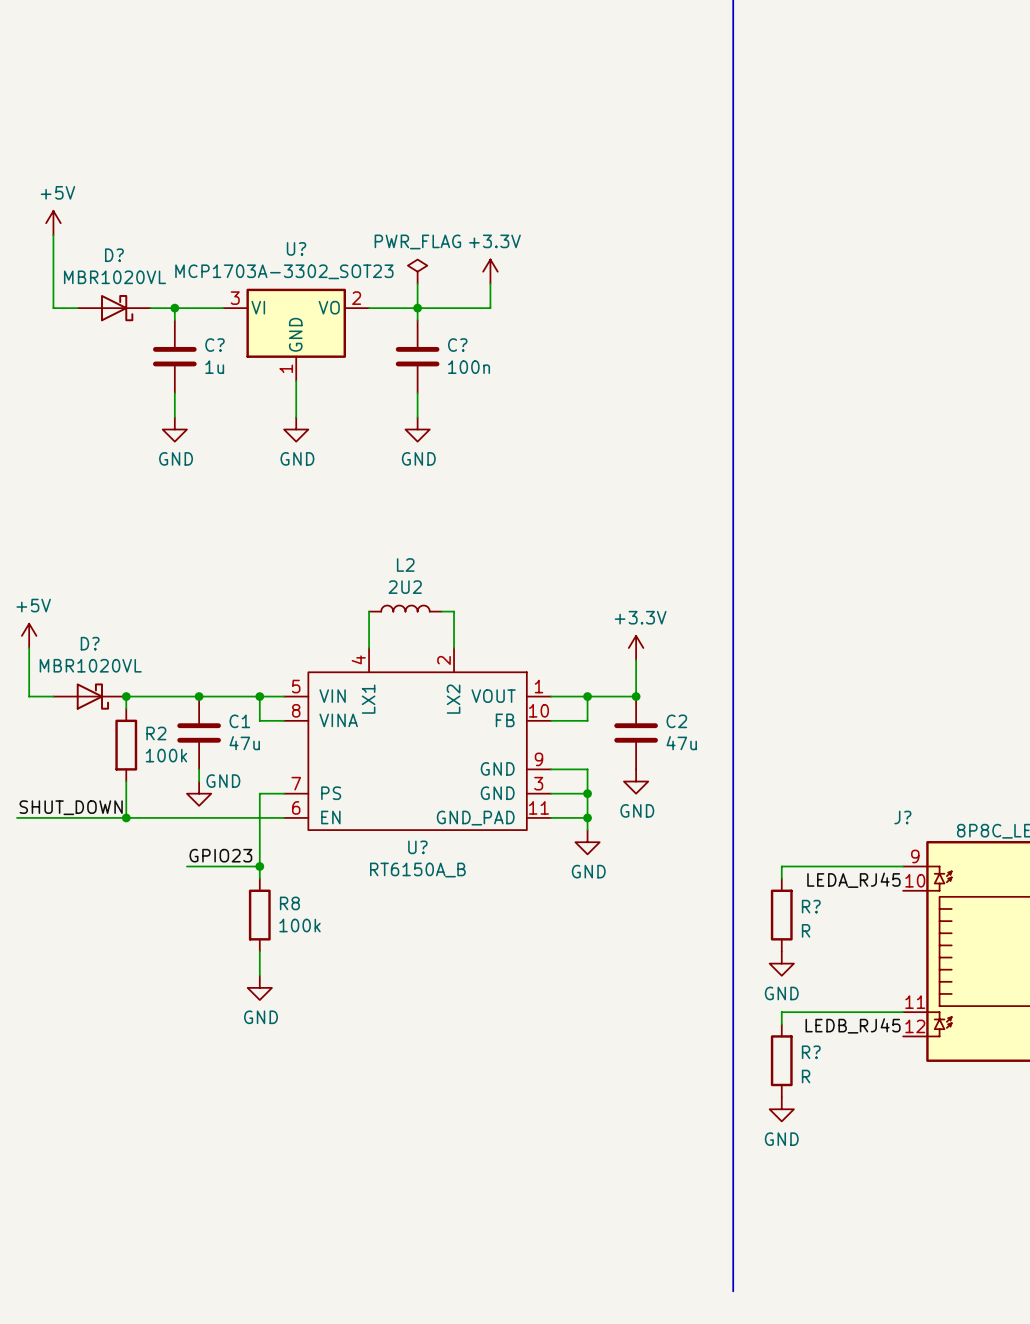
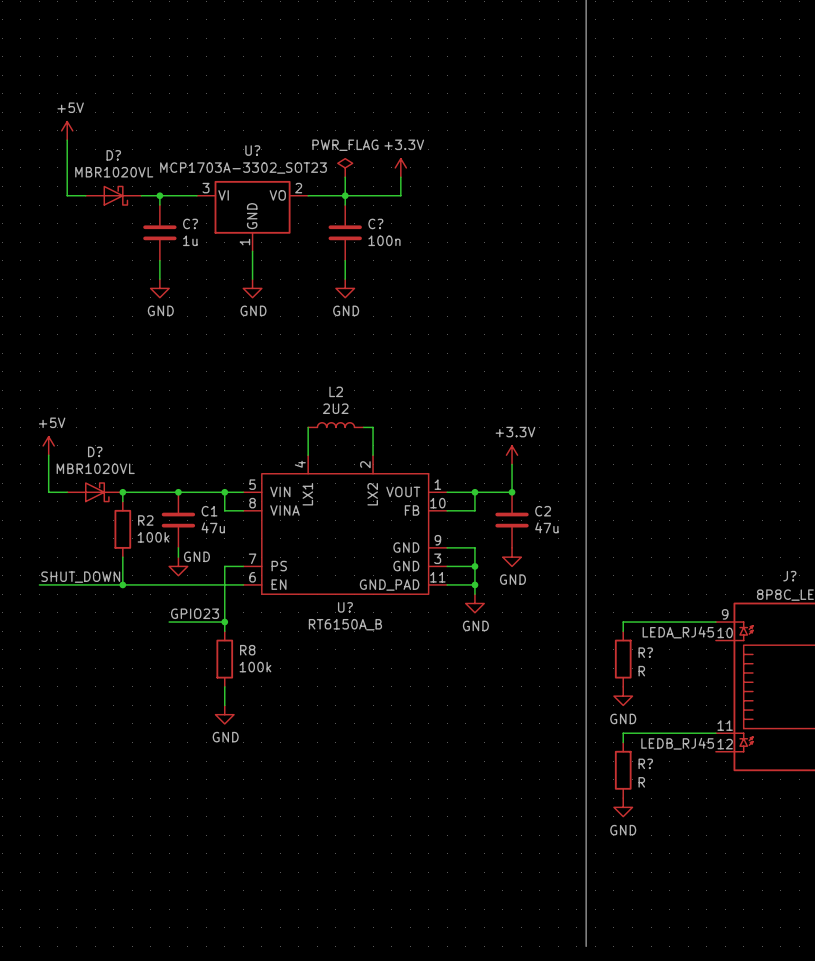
J? name position: J? (902, 817) -> J? (789, 576)

